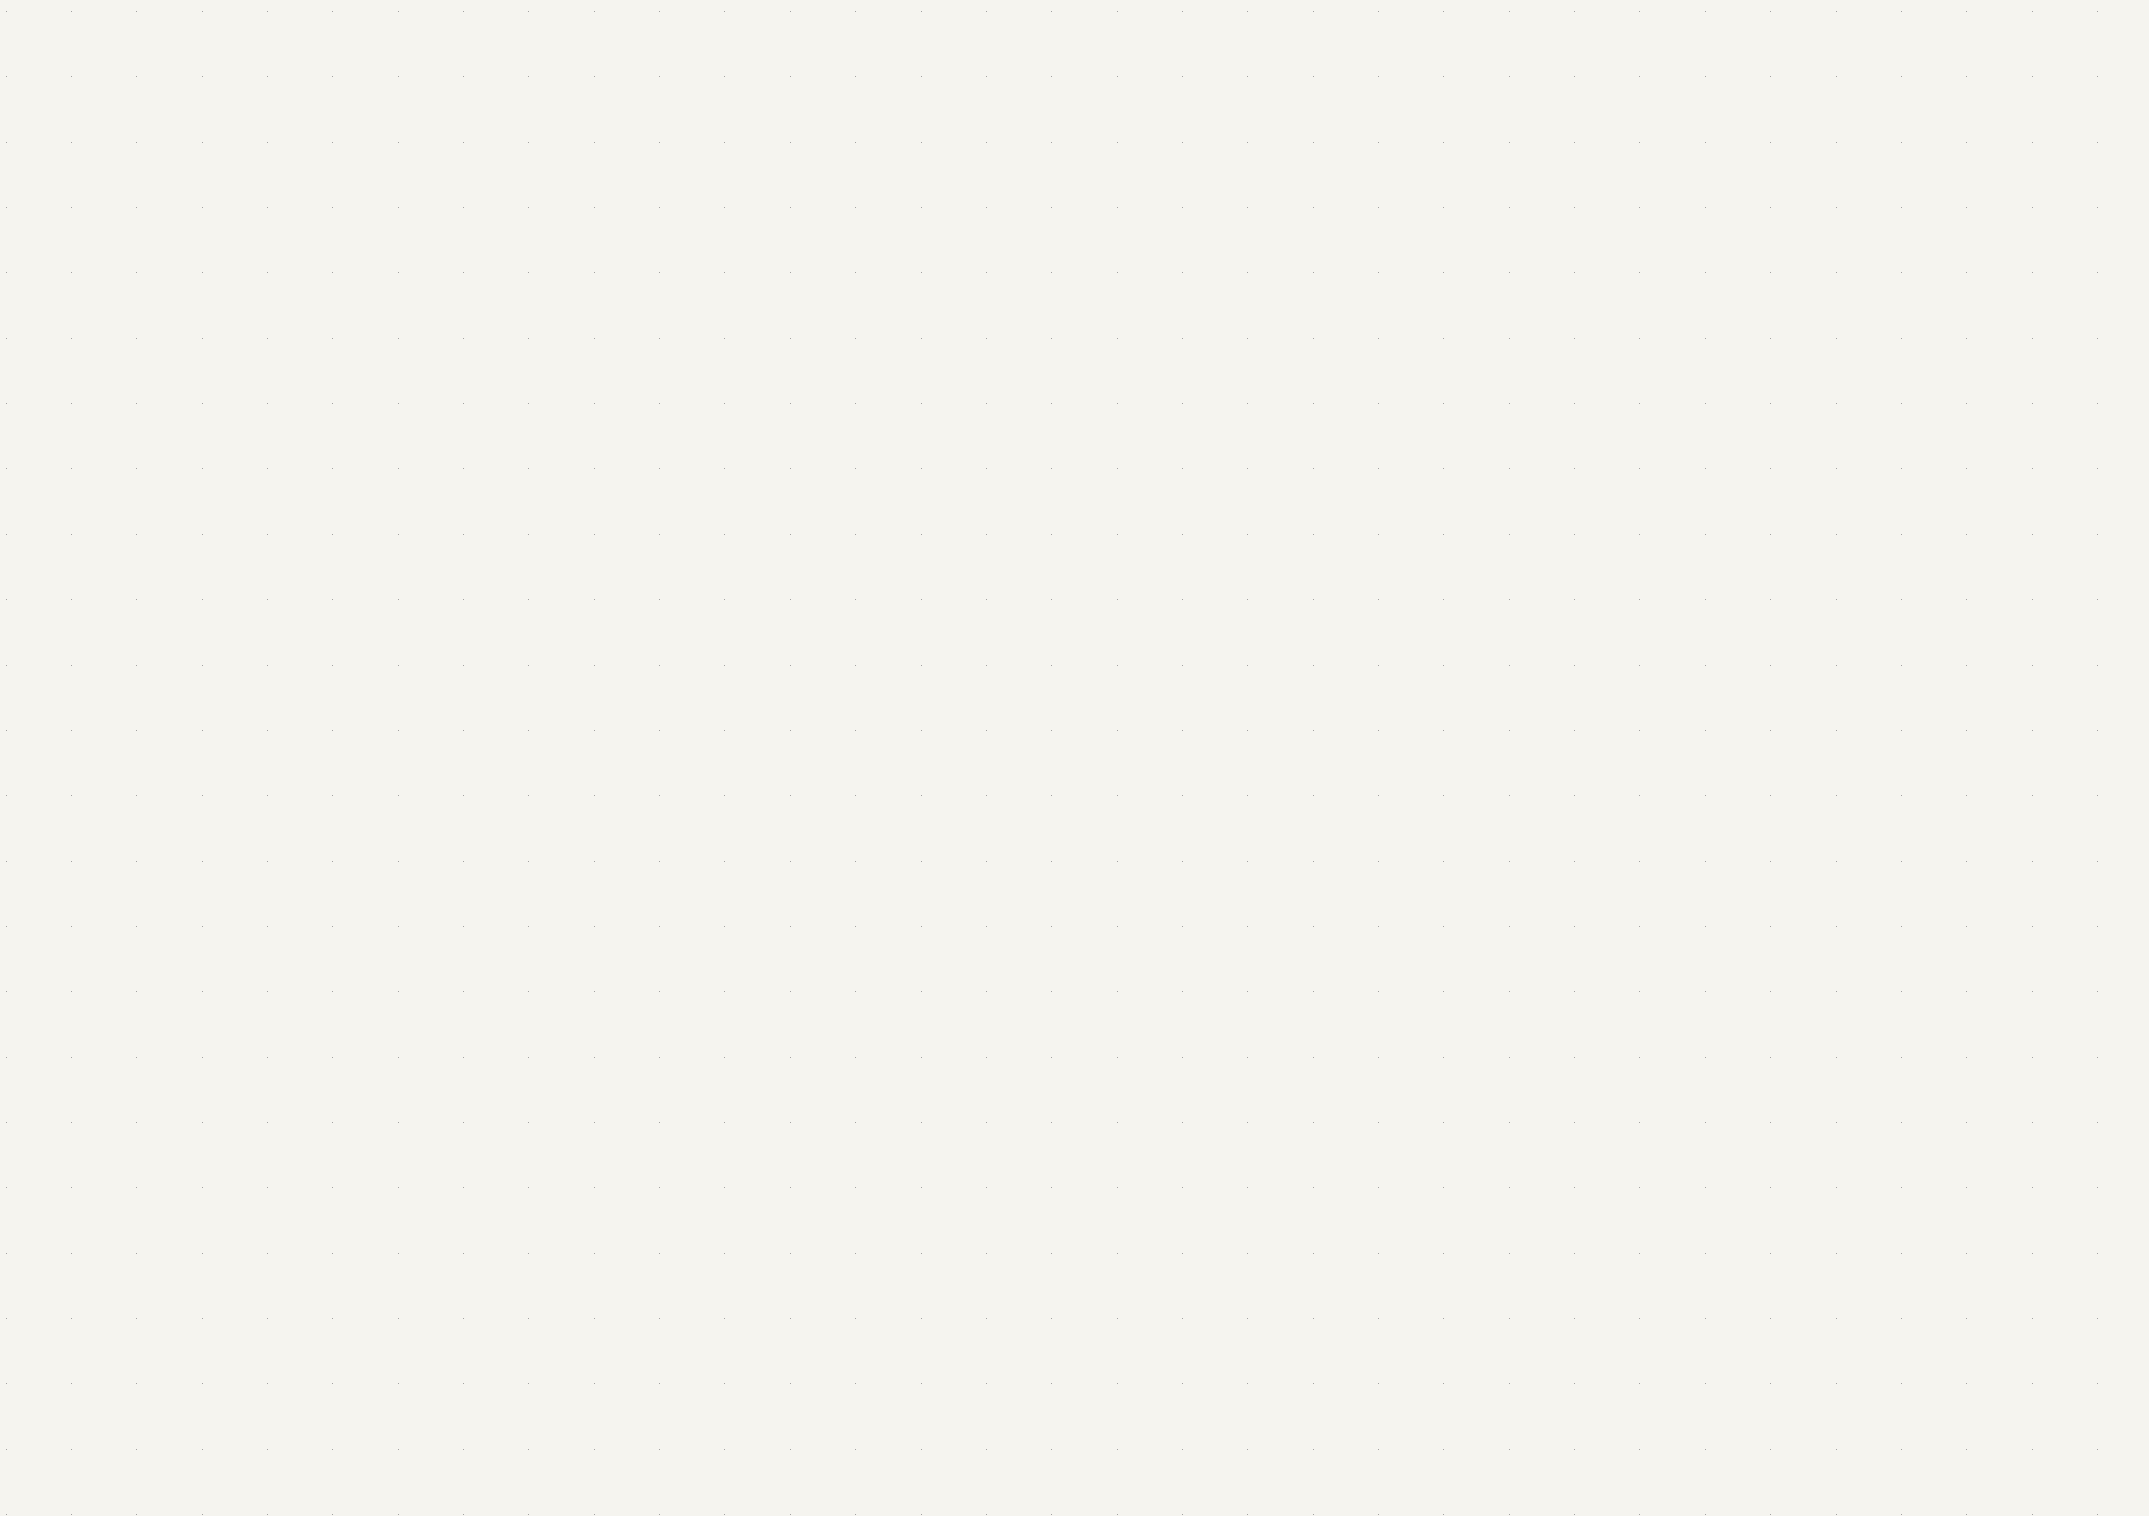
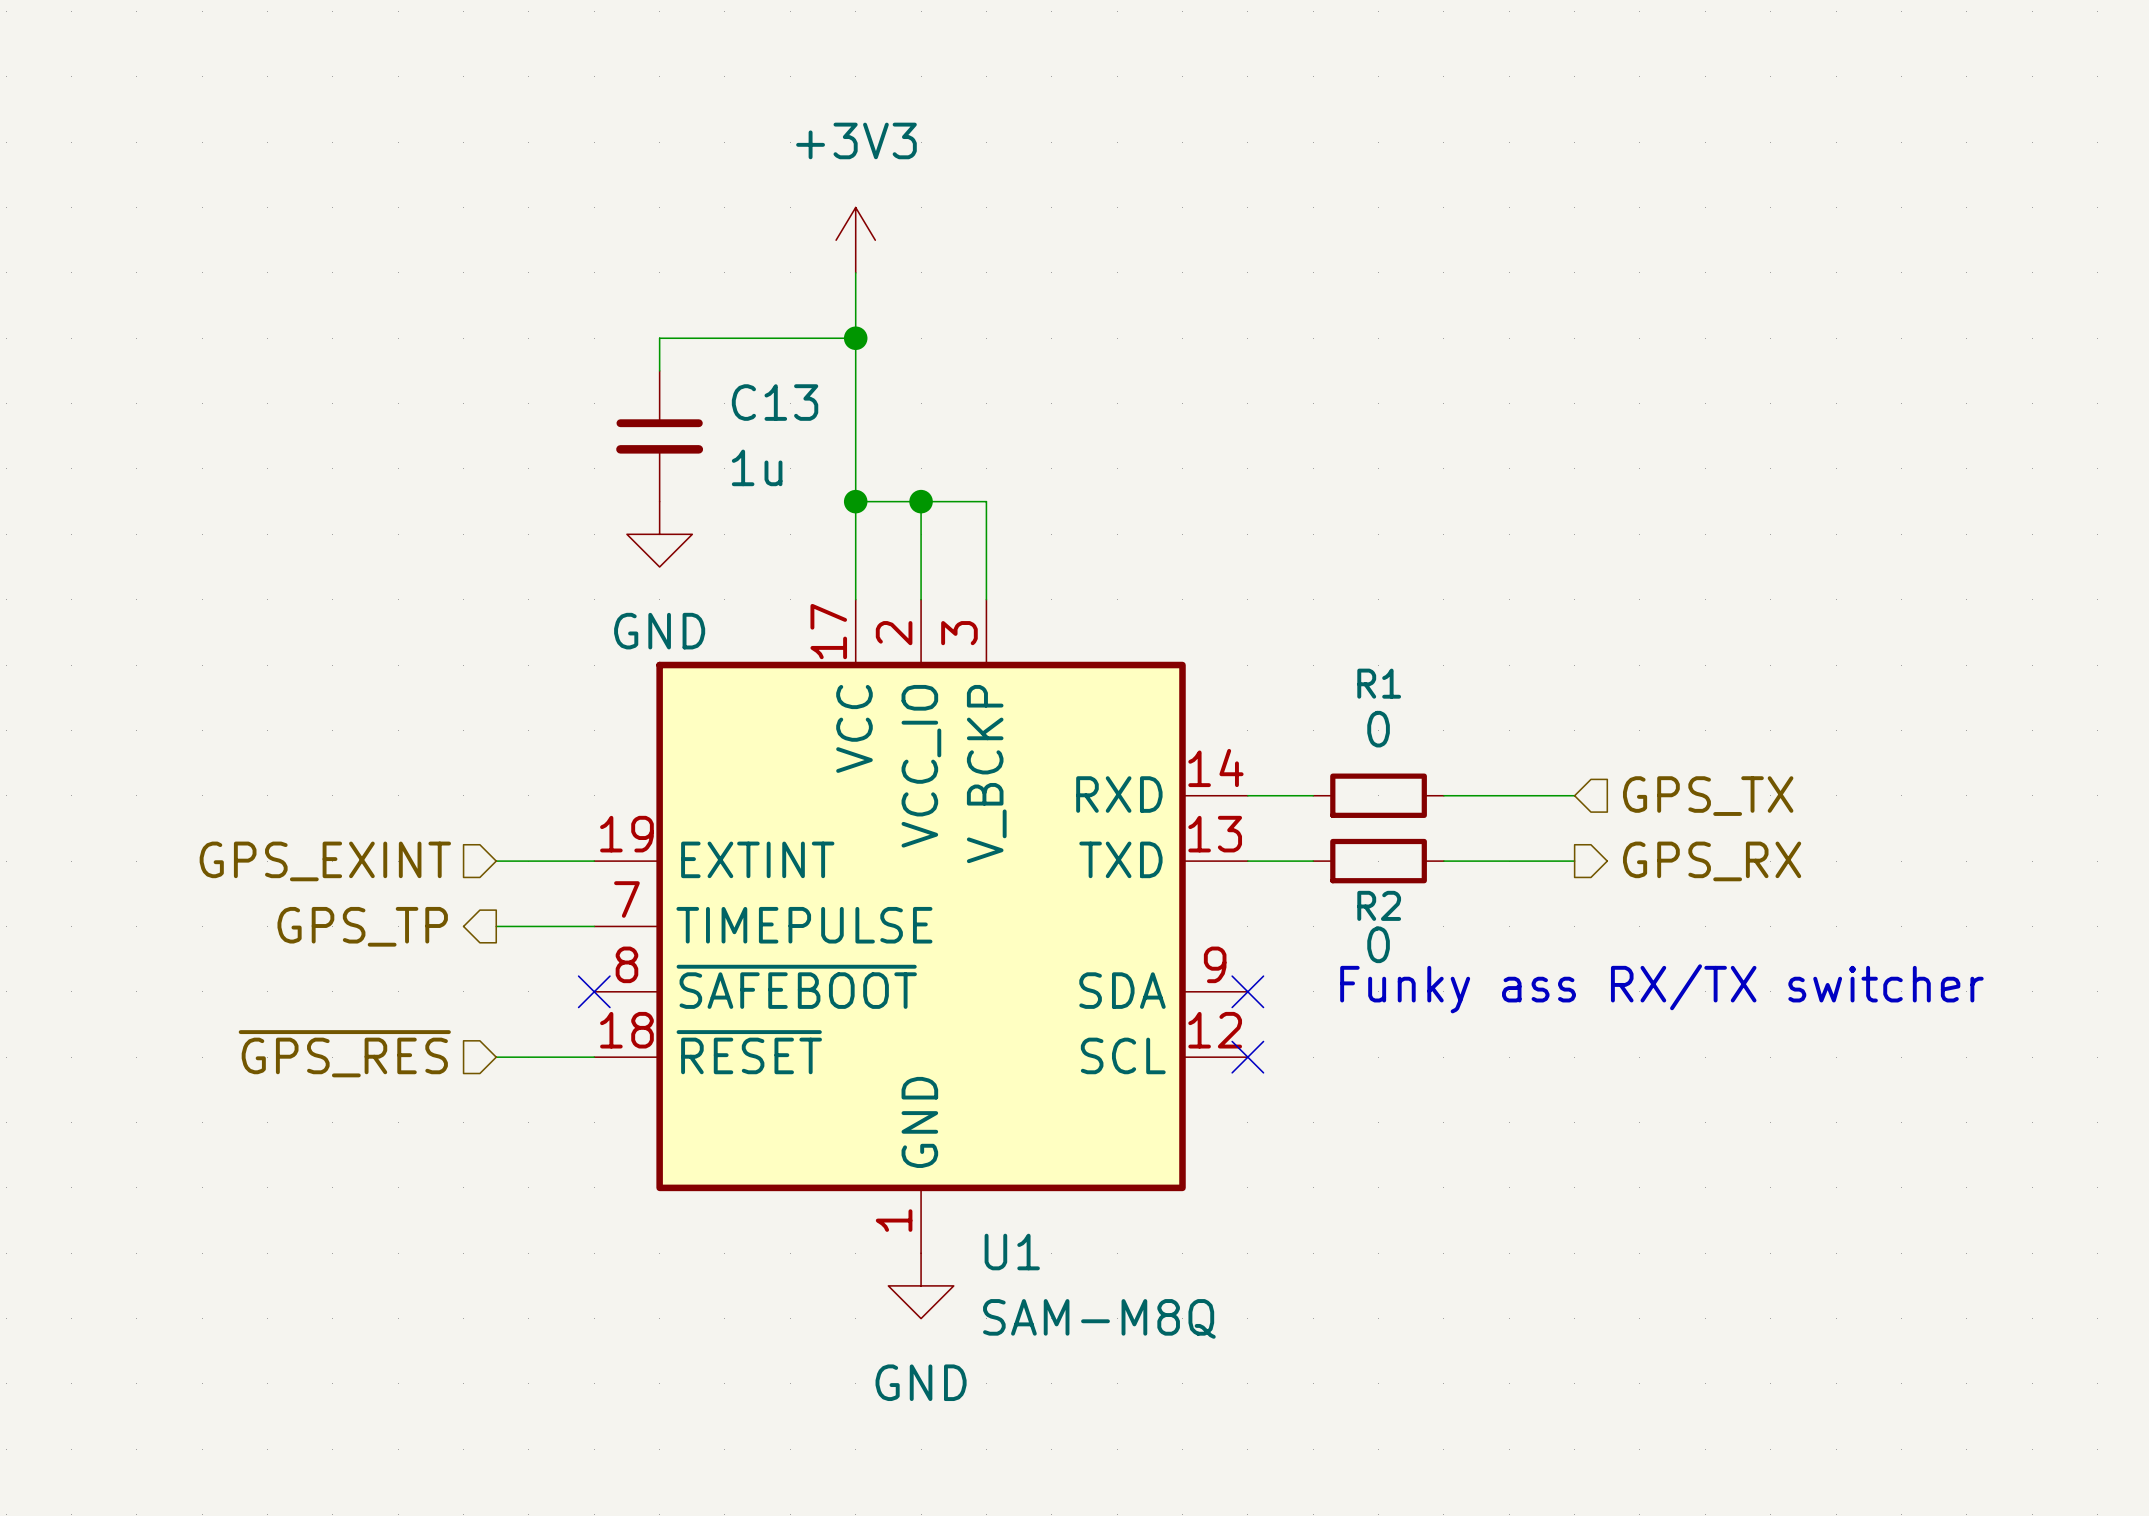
power symbol: none -> +3V3 (855, 240)
wire: none -> (855, 272) (855, 599)
wire: none -> (855, 338) (659, 338) (659, 370)
junction: none -> (855, 338)
C13: none -> 1u (659, 436)
wire: none -> (855, 501) (986, 501) (986, 599)
junction: none -> (855, 501)
wire: none -> (921, 501) (921, 599)
junction: none -> (921, 501)
power symbol: none -> GND (659, 534)
wire: none -> (1247, 795) (1313, 795)
R1: none -> 0 (1378, 795)
wire: none -> (1443, 795) (1574, 795)
hierarchical label: none -> GPS_TX (1708, 796)
hierarchical label: none -> GPS_EXINT (325, 861)
wire: none -> (496, 861) (594, 861)
wire: none -> (1247, 861) (1313, 861)
R2: none -> 0 (1378, 861)
wire: none -> (1443, 861) (1574, 861)
hierarchical label: none -> GPS_RX (1712, 861)
hierarchical label: none -> GPS_TP (362, 926)
wire: none -> (496, 926) (594, 926)
U1: none -> SAM-M8Q (921, 926)
text: none -> Funky ass RX/TX switcher (1661, 988)
no-connect mark: none -> (594, 991)
no-connect mark: none -> (1247, 991)
hierarchical label: none -> ~{GPS_RES} (344, 1053)
wire: none -> (496, 1057) (594, 1057)
no-connect mark: none -> (1247, 1057)
power symbol: none -> GND (921, 1285)

